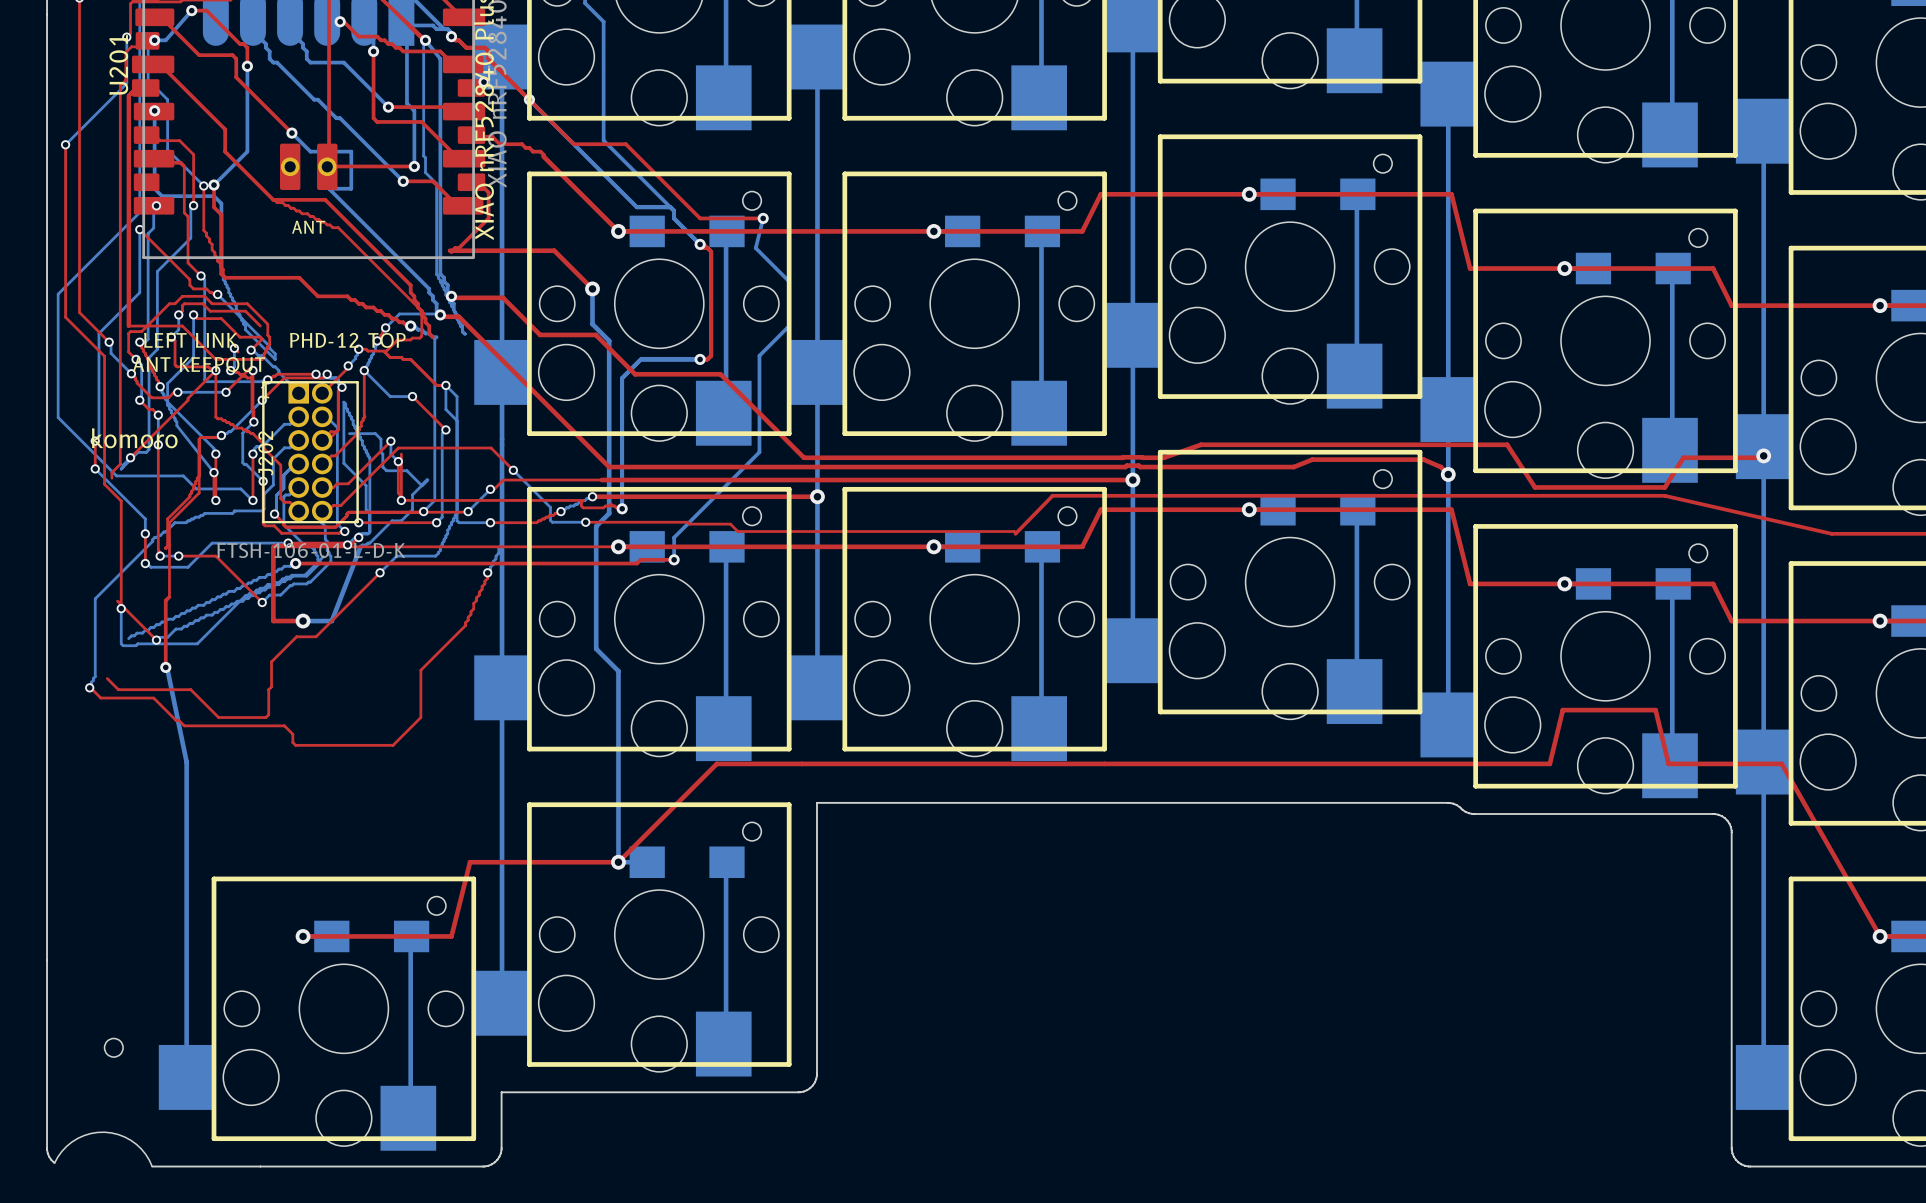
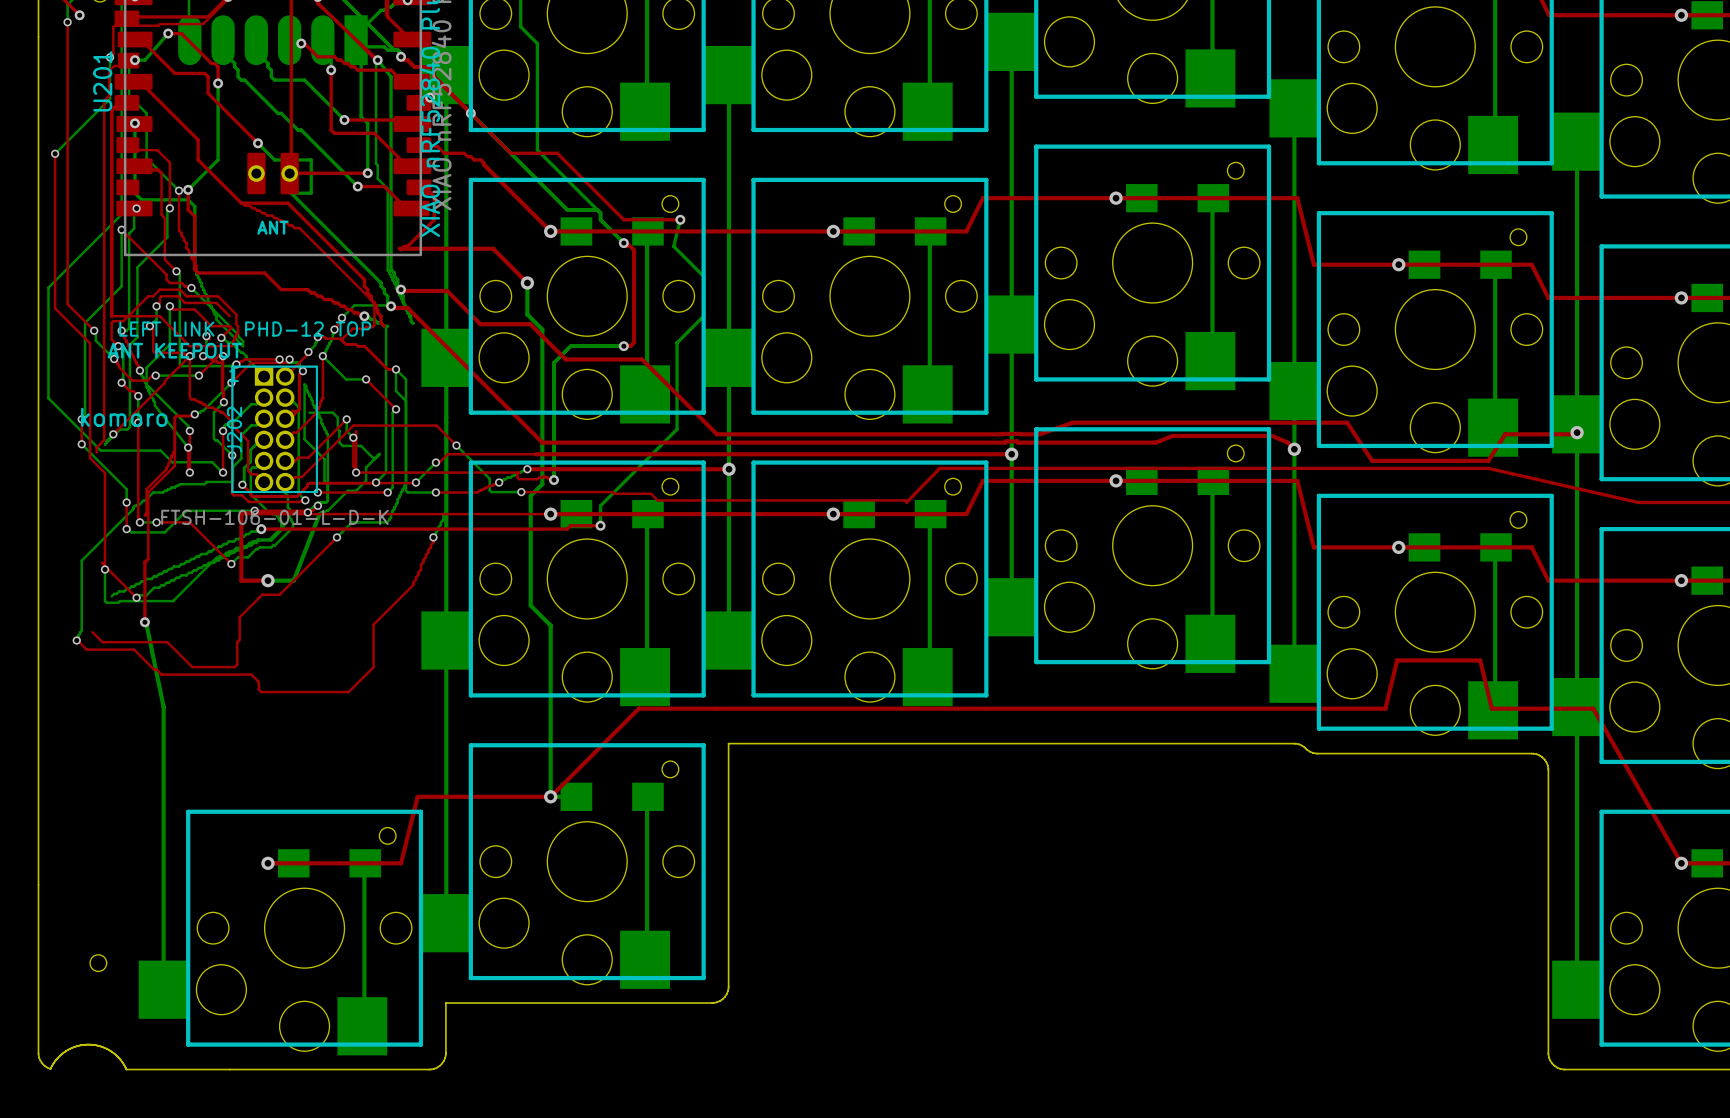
board edge: (54, 1162) (62, 1151) (77, 1138) (90, 1133) (104, 1132) (118, 1134) (130, 1140) (141, 1149) (152, 1166) -> (126, 1069) (132, 1069)
board edge: none -> (45, 1066) (50, 1068)
board edge: none -> (50, 1068) (56, 1059) (66, 1051) (76, 1046) (88, 1044) (100, 1046) (111, 1051) (119, 1059) (126, 1069)

